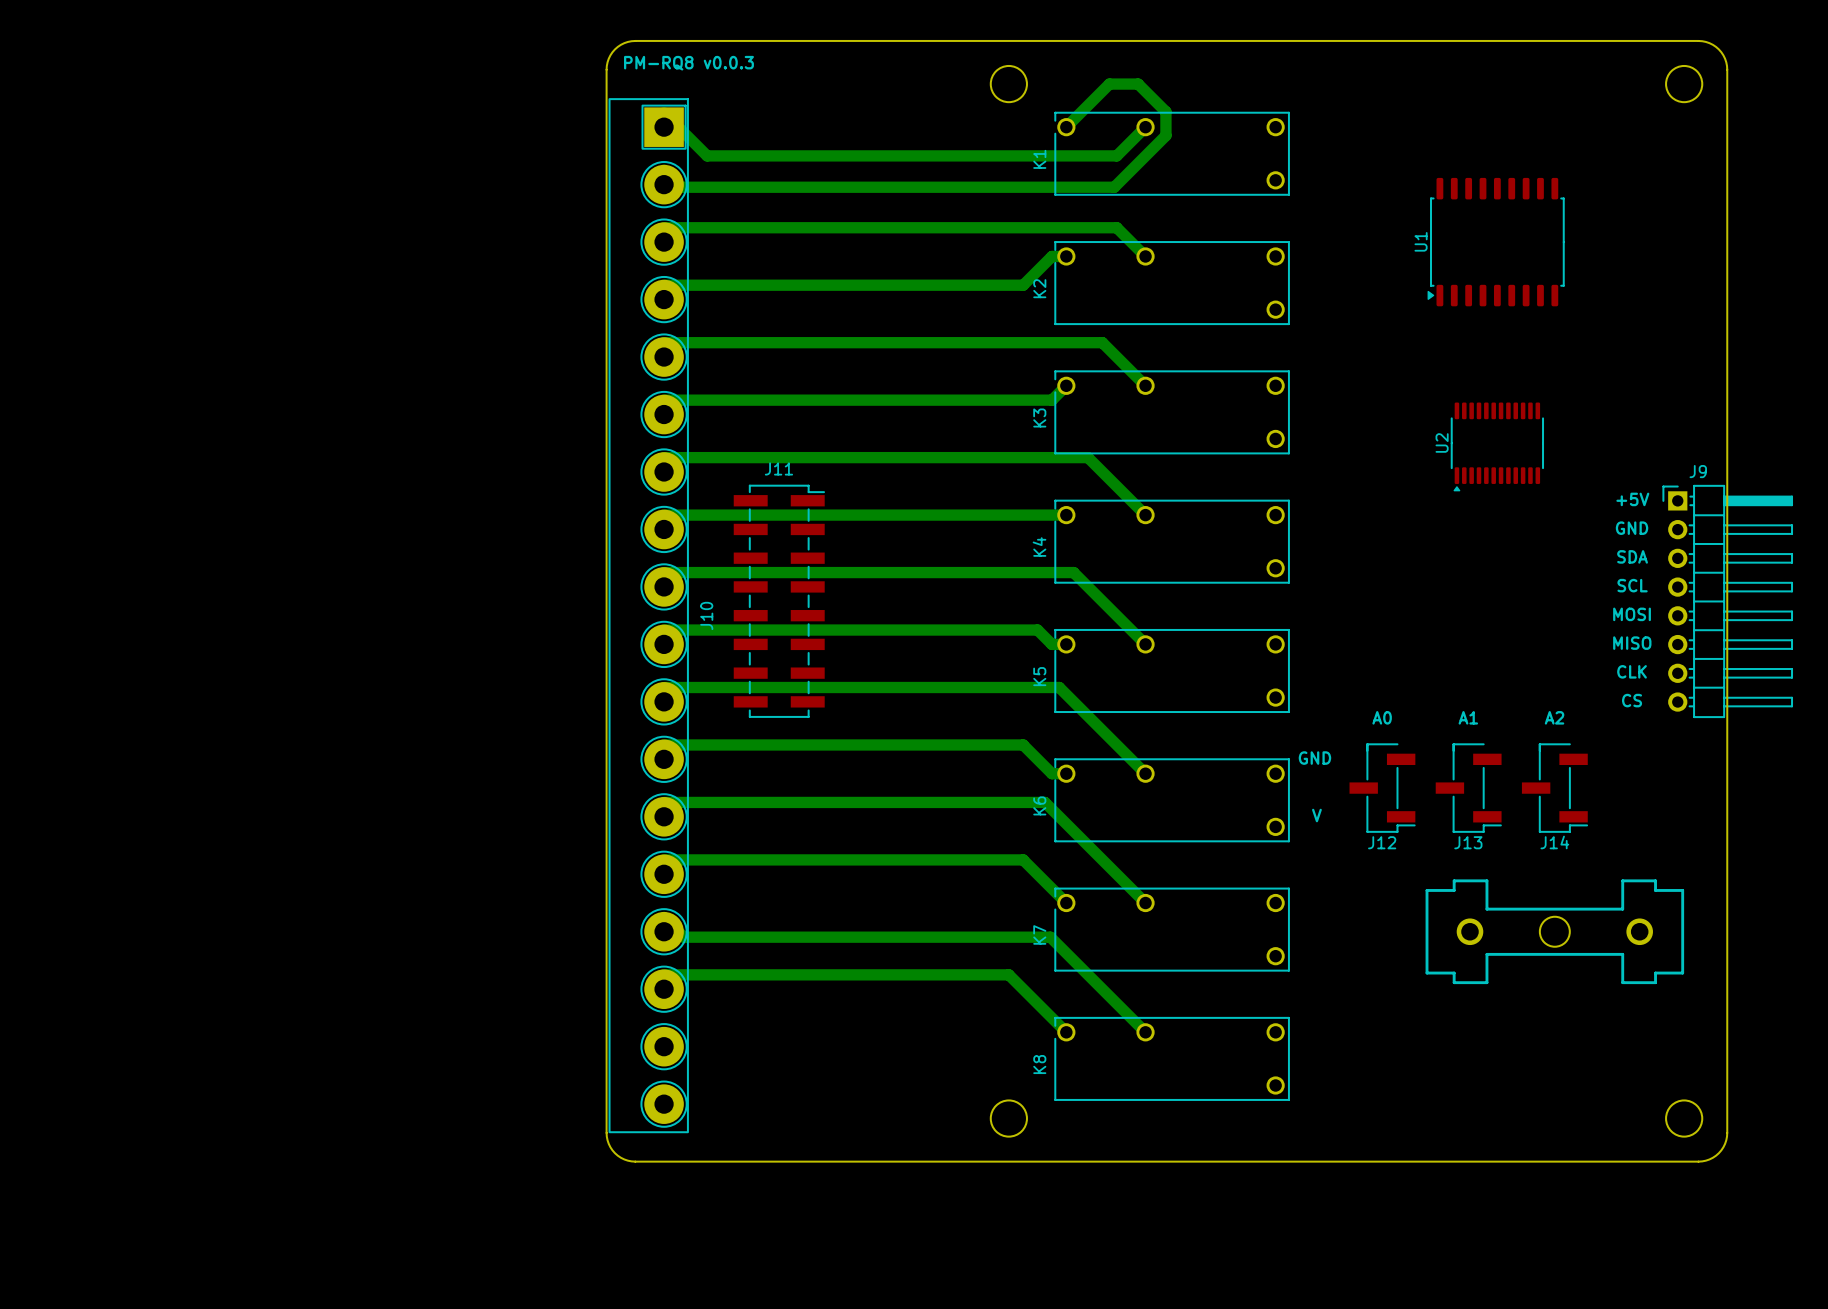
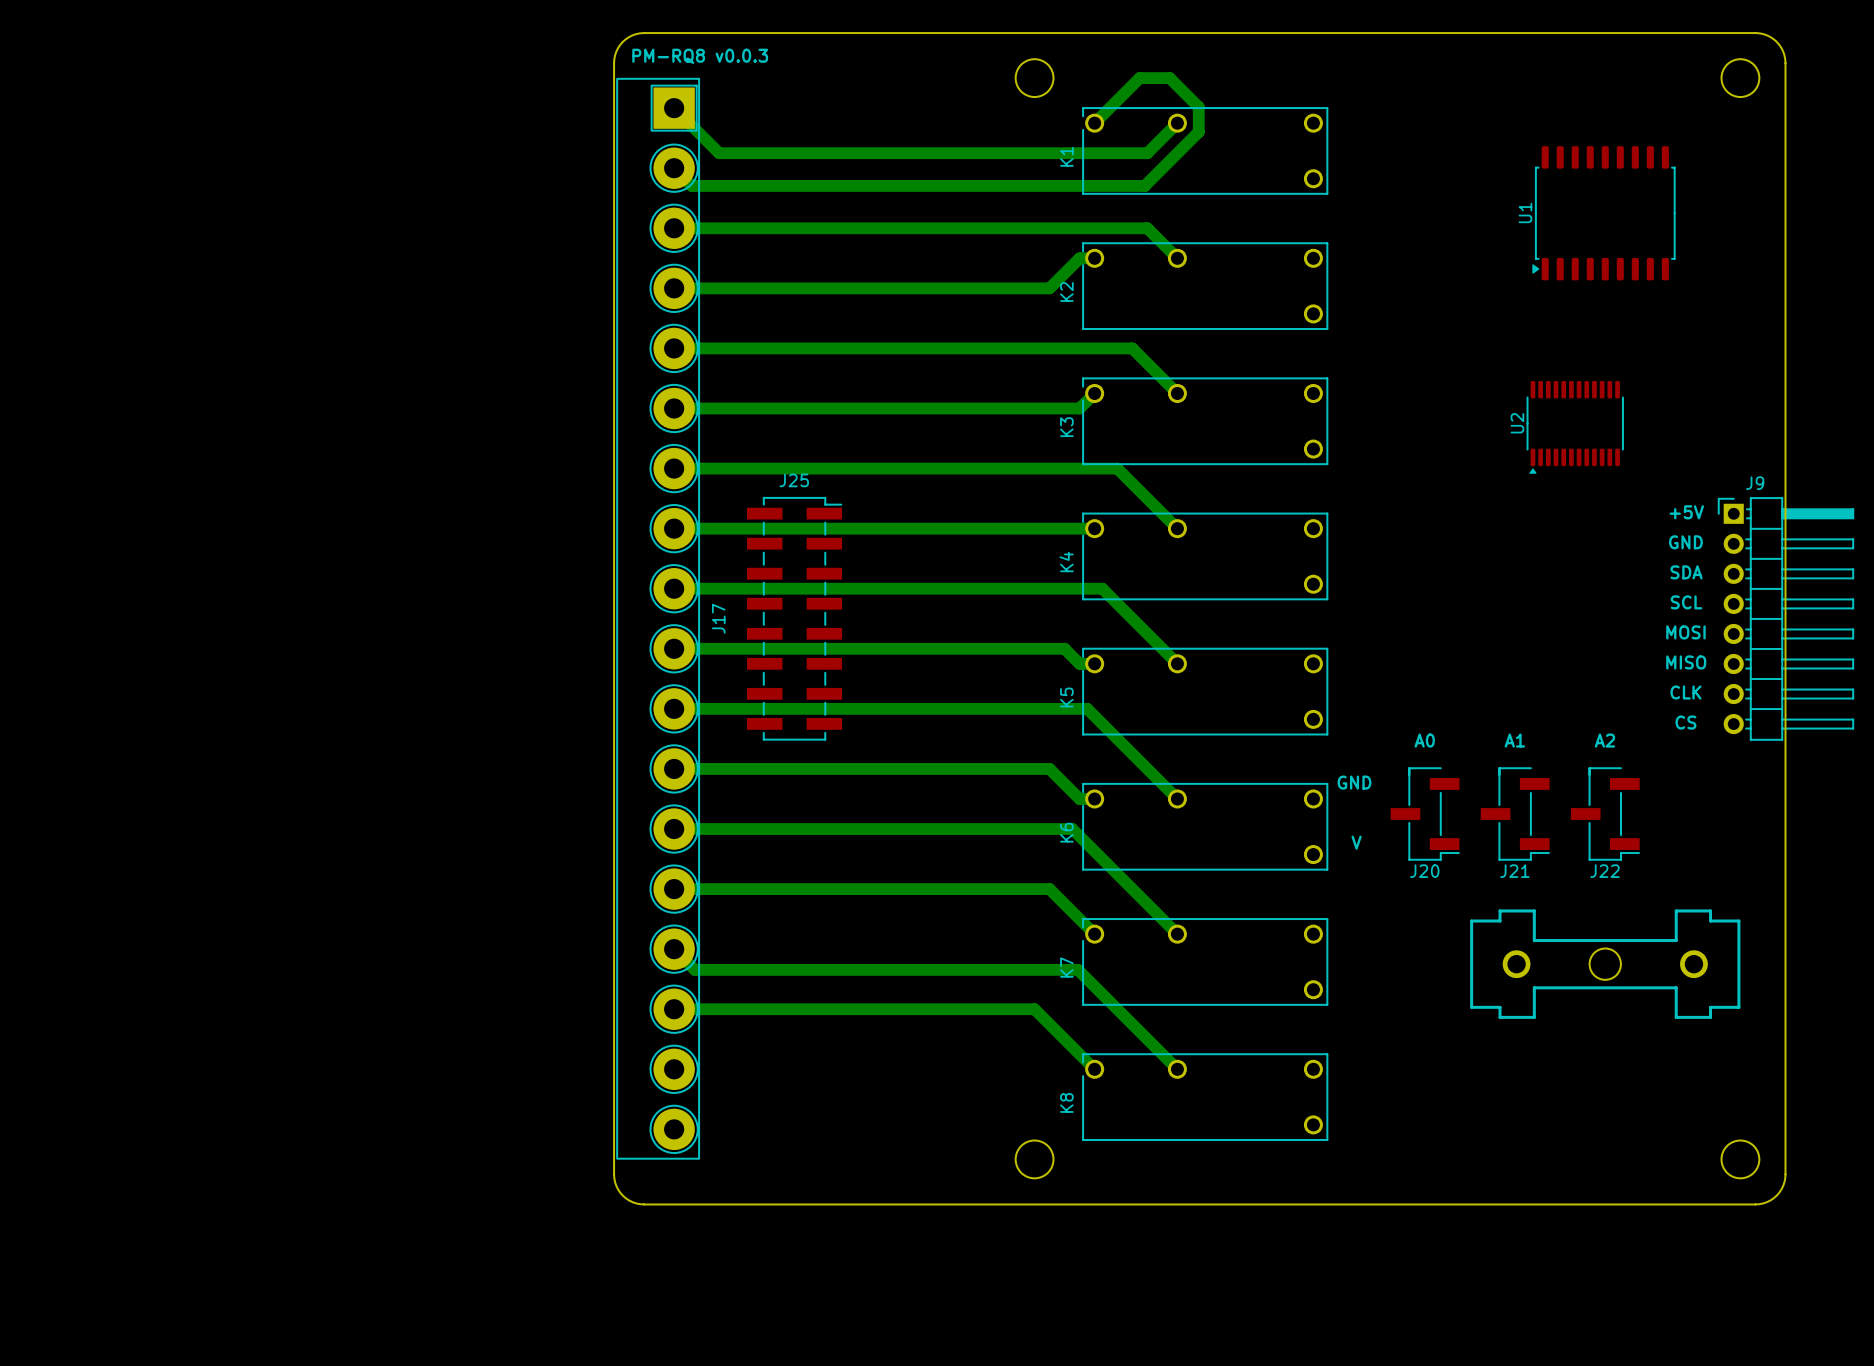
U1 position: (1496, 242) -> (1603, 213)
U2 position: (1497, 446) -> (1575, 427)
J11 name: J11 (778, 468) -> J25 (794, 480)
J17: none -> (658, 618)
J10: (648, 615) -> none
J12 name: J12 (1382, 842) -> J20 (1424, 871)
J13 name: J13 (1468, 842) -> J21 (1514, 871)
J14 name: J14 (1554, 842) -> J22 (1604, 871)

